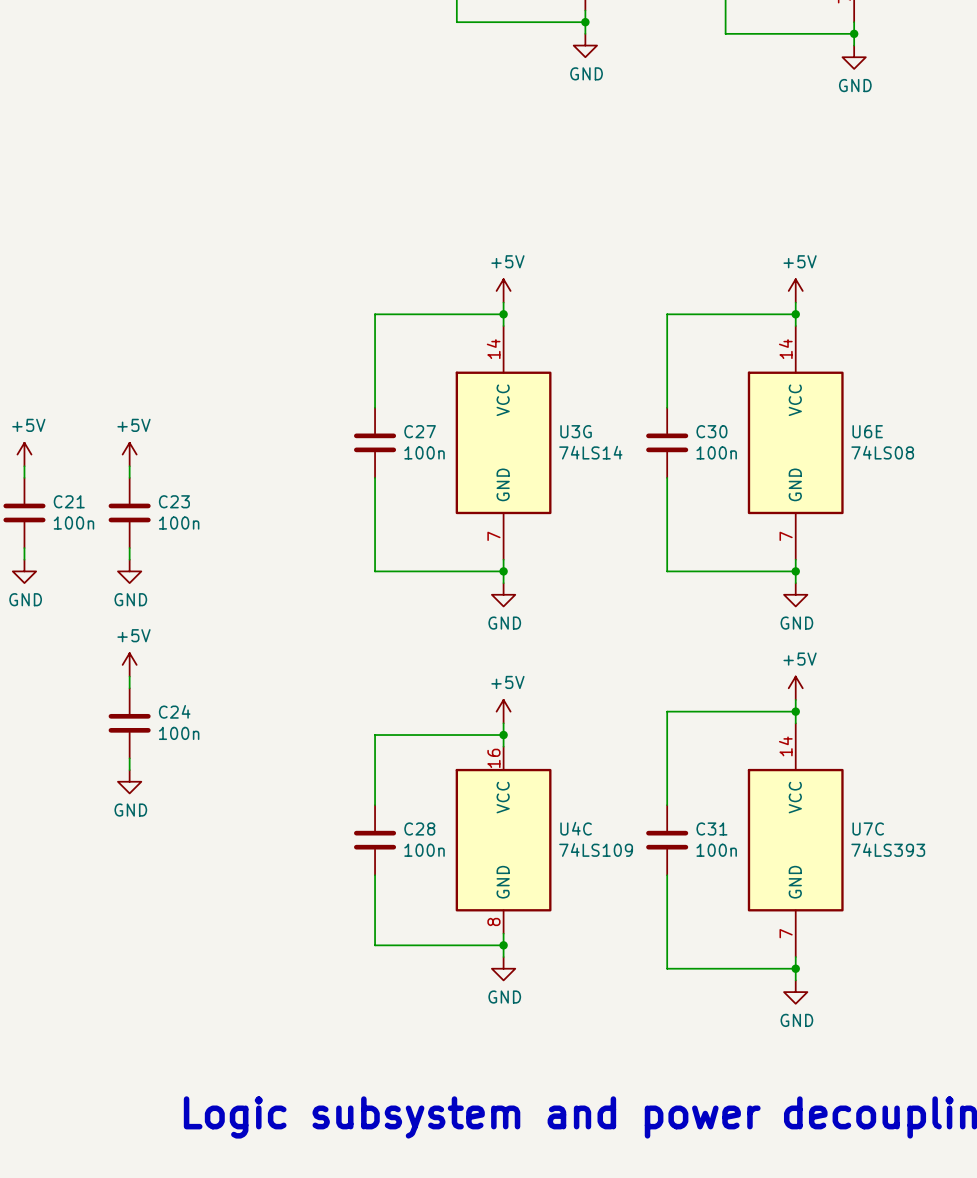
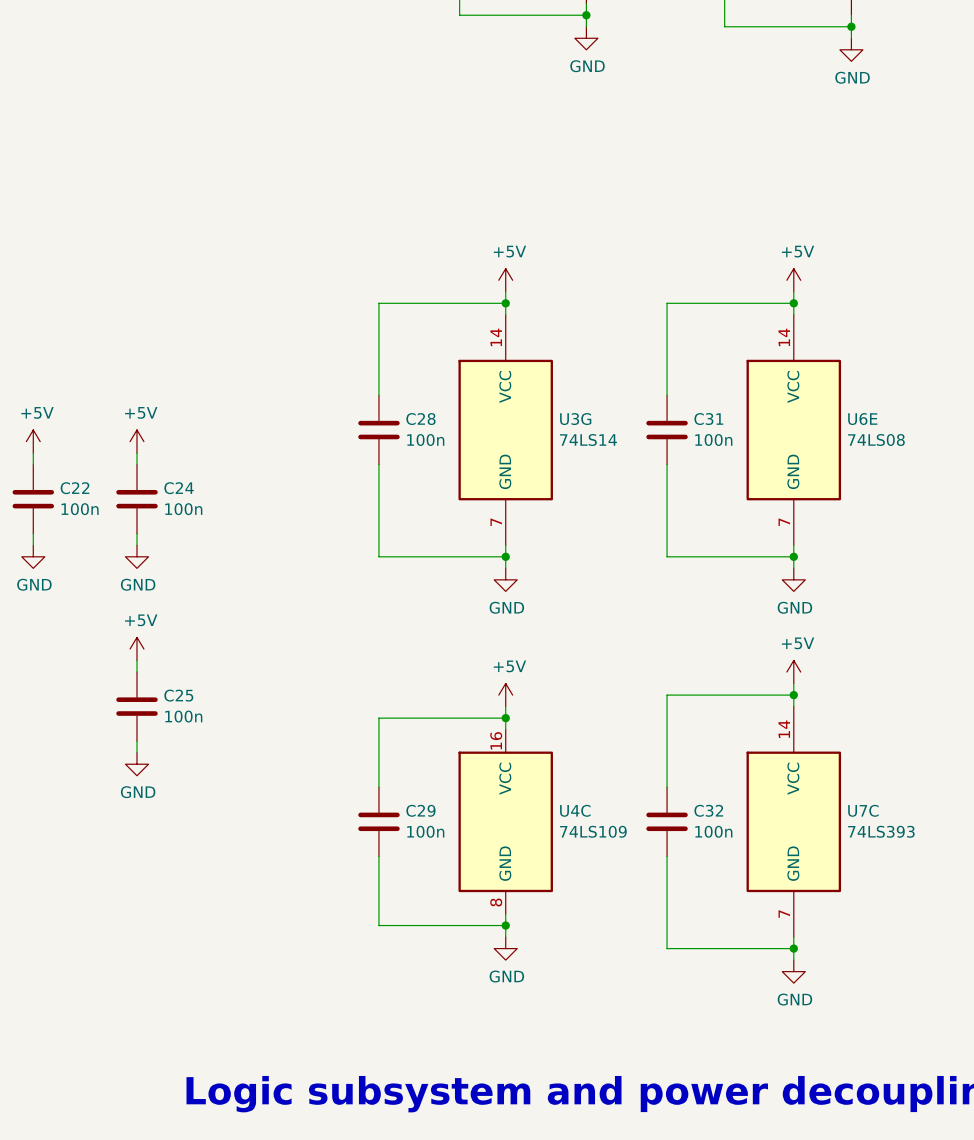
C27 name: C27 (420, 431) -> C28 (420, 419)
C30 name: C30 (711, 431) -> C31 (708, 419)
C21 name: C21 (69, 501) -> C22 (75, 488)
C23 name: C23 (174, 501) -> C24 (179, 488)
C24 name: C24 (174, 711) -> C25 (178, 695)
C28 name: C28 (419, 828) -> C29 (420, 810)
C31 name: C31 (711, 828) -> C32 (708, 810)

